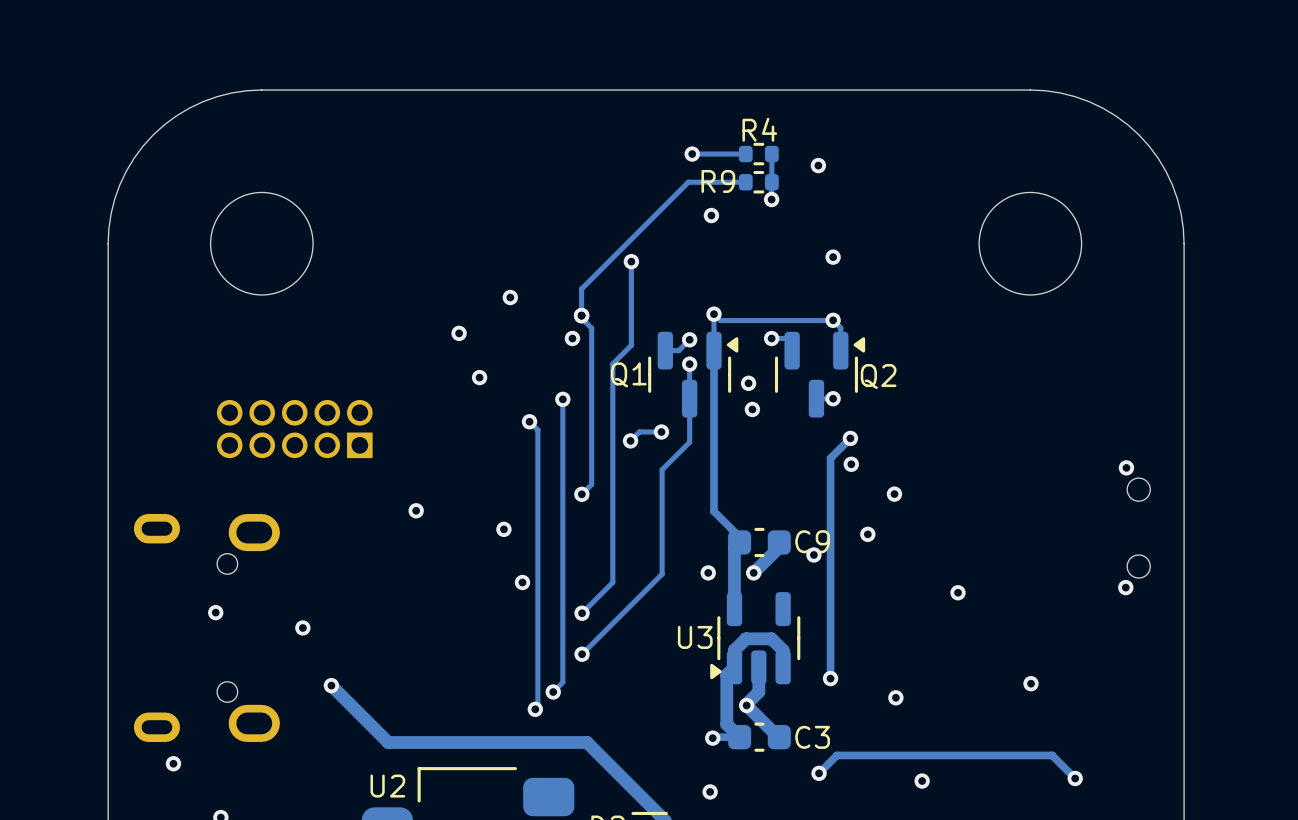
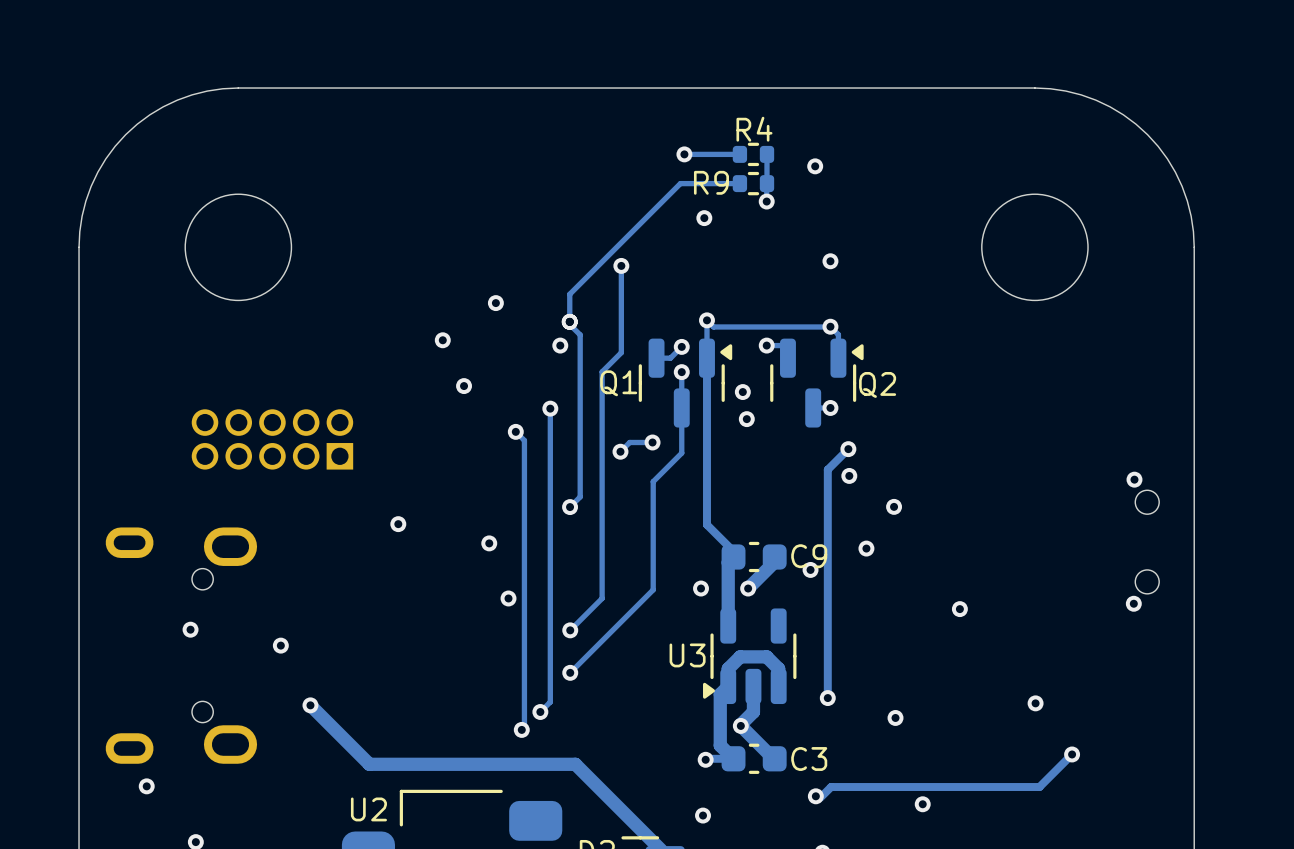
track: none -> (1072, 754) (1039, 787) (831, 787) (820, 797)
track: (819, 773) (836, 755) (1052, 755) (1075, 778) -> none
via position: (1075, 778) -> (1072, 754)

